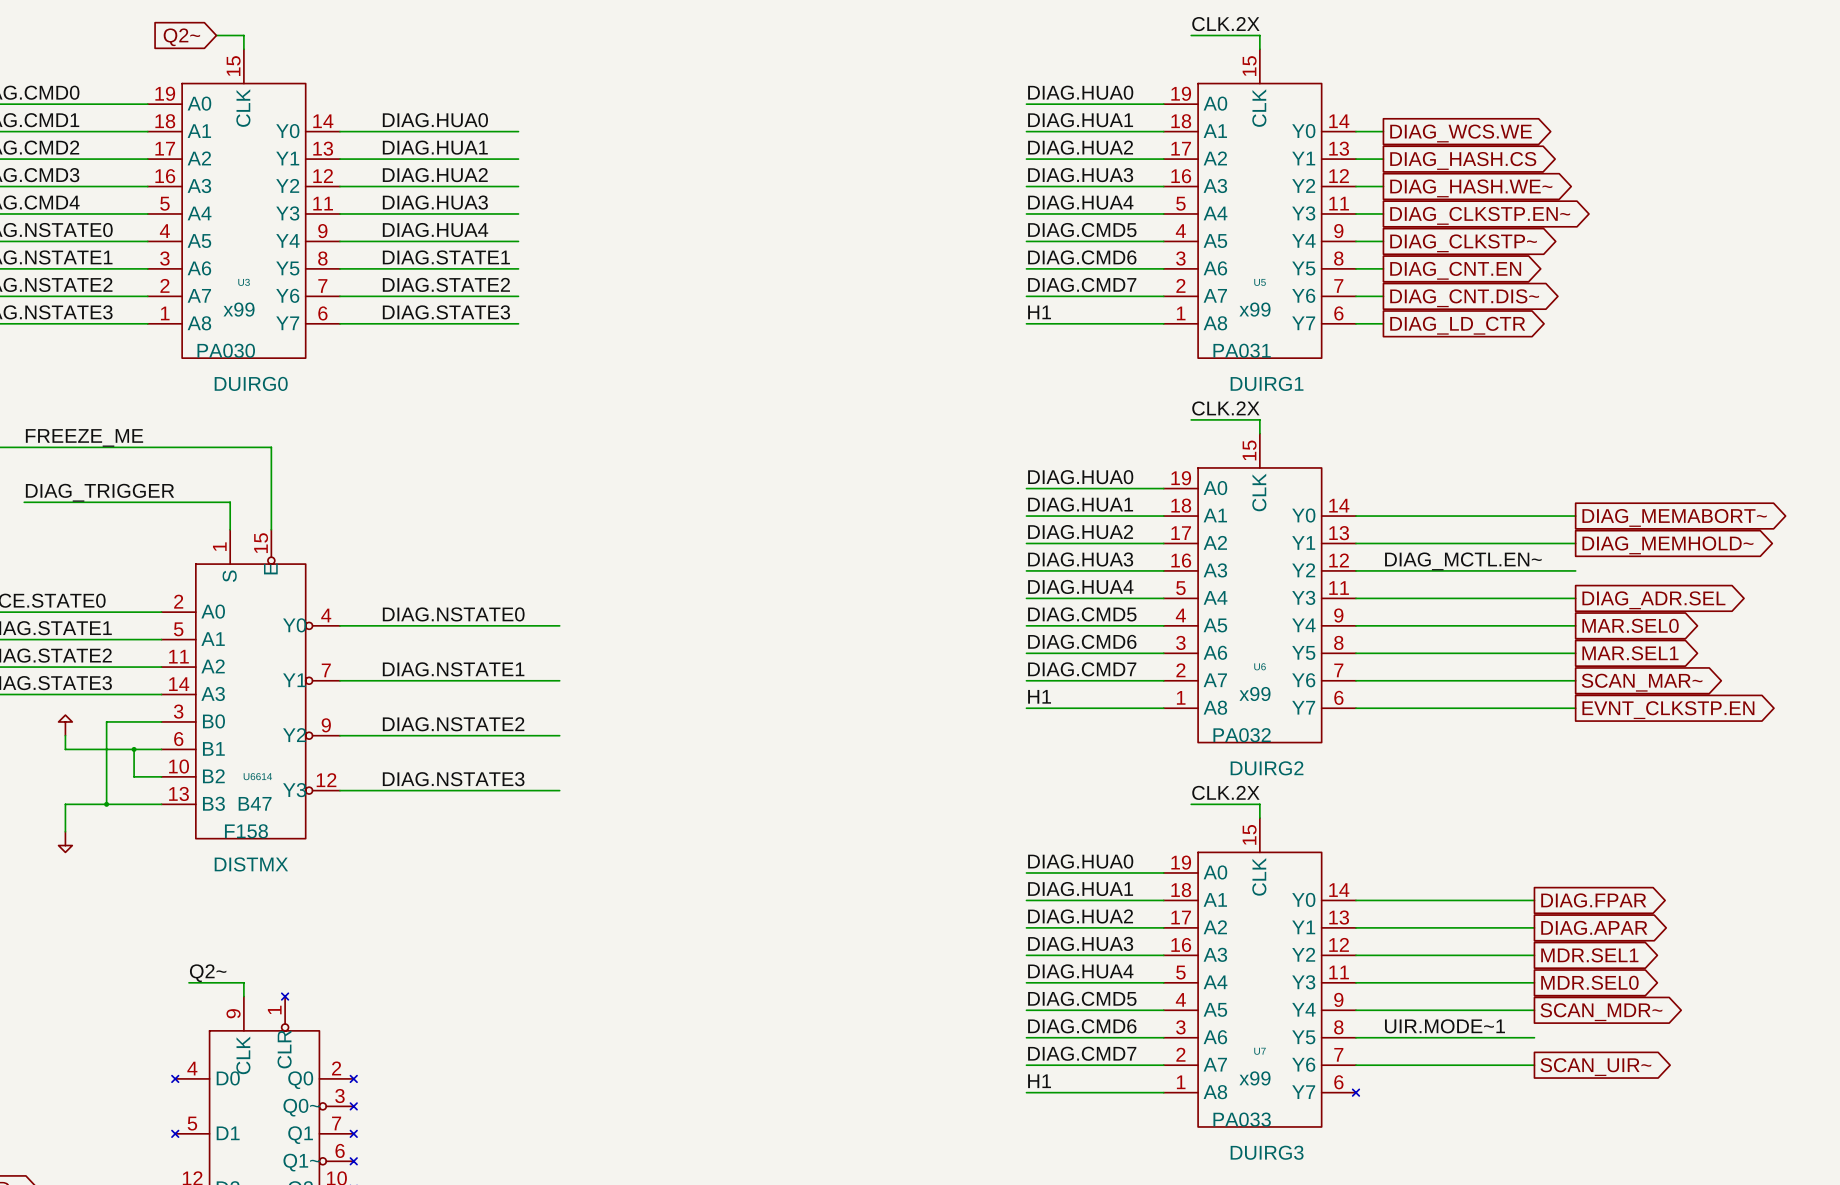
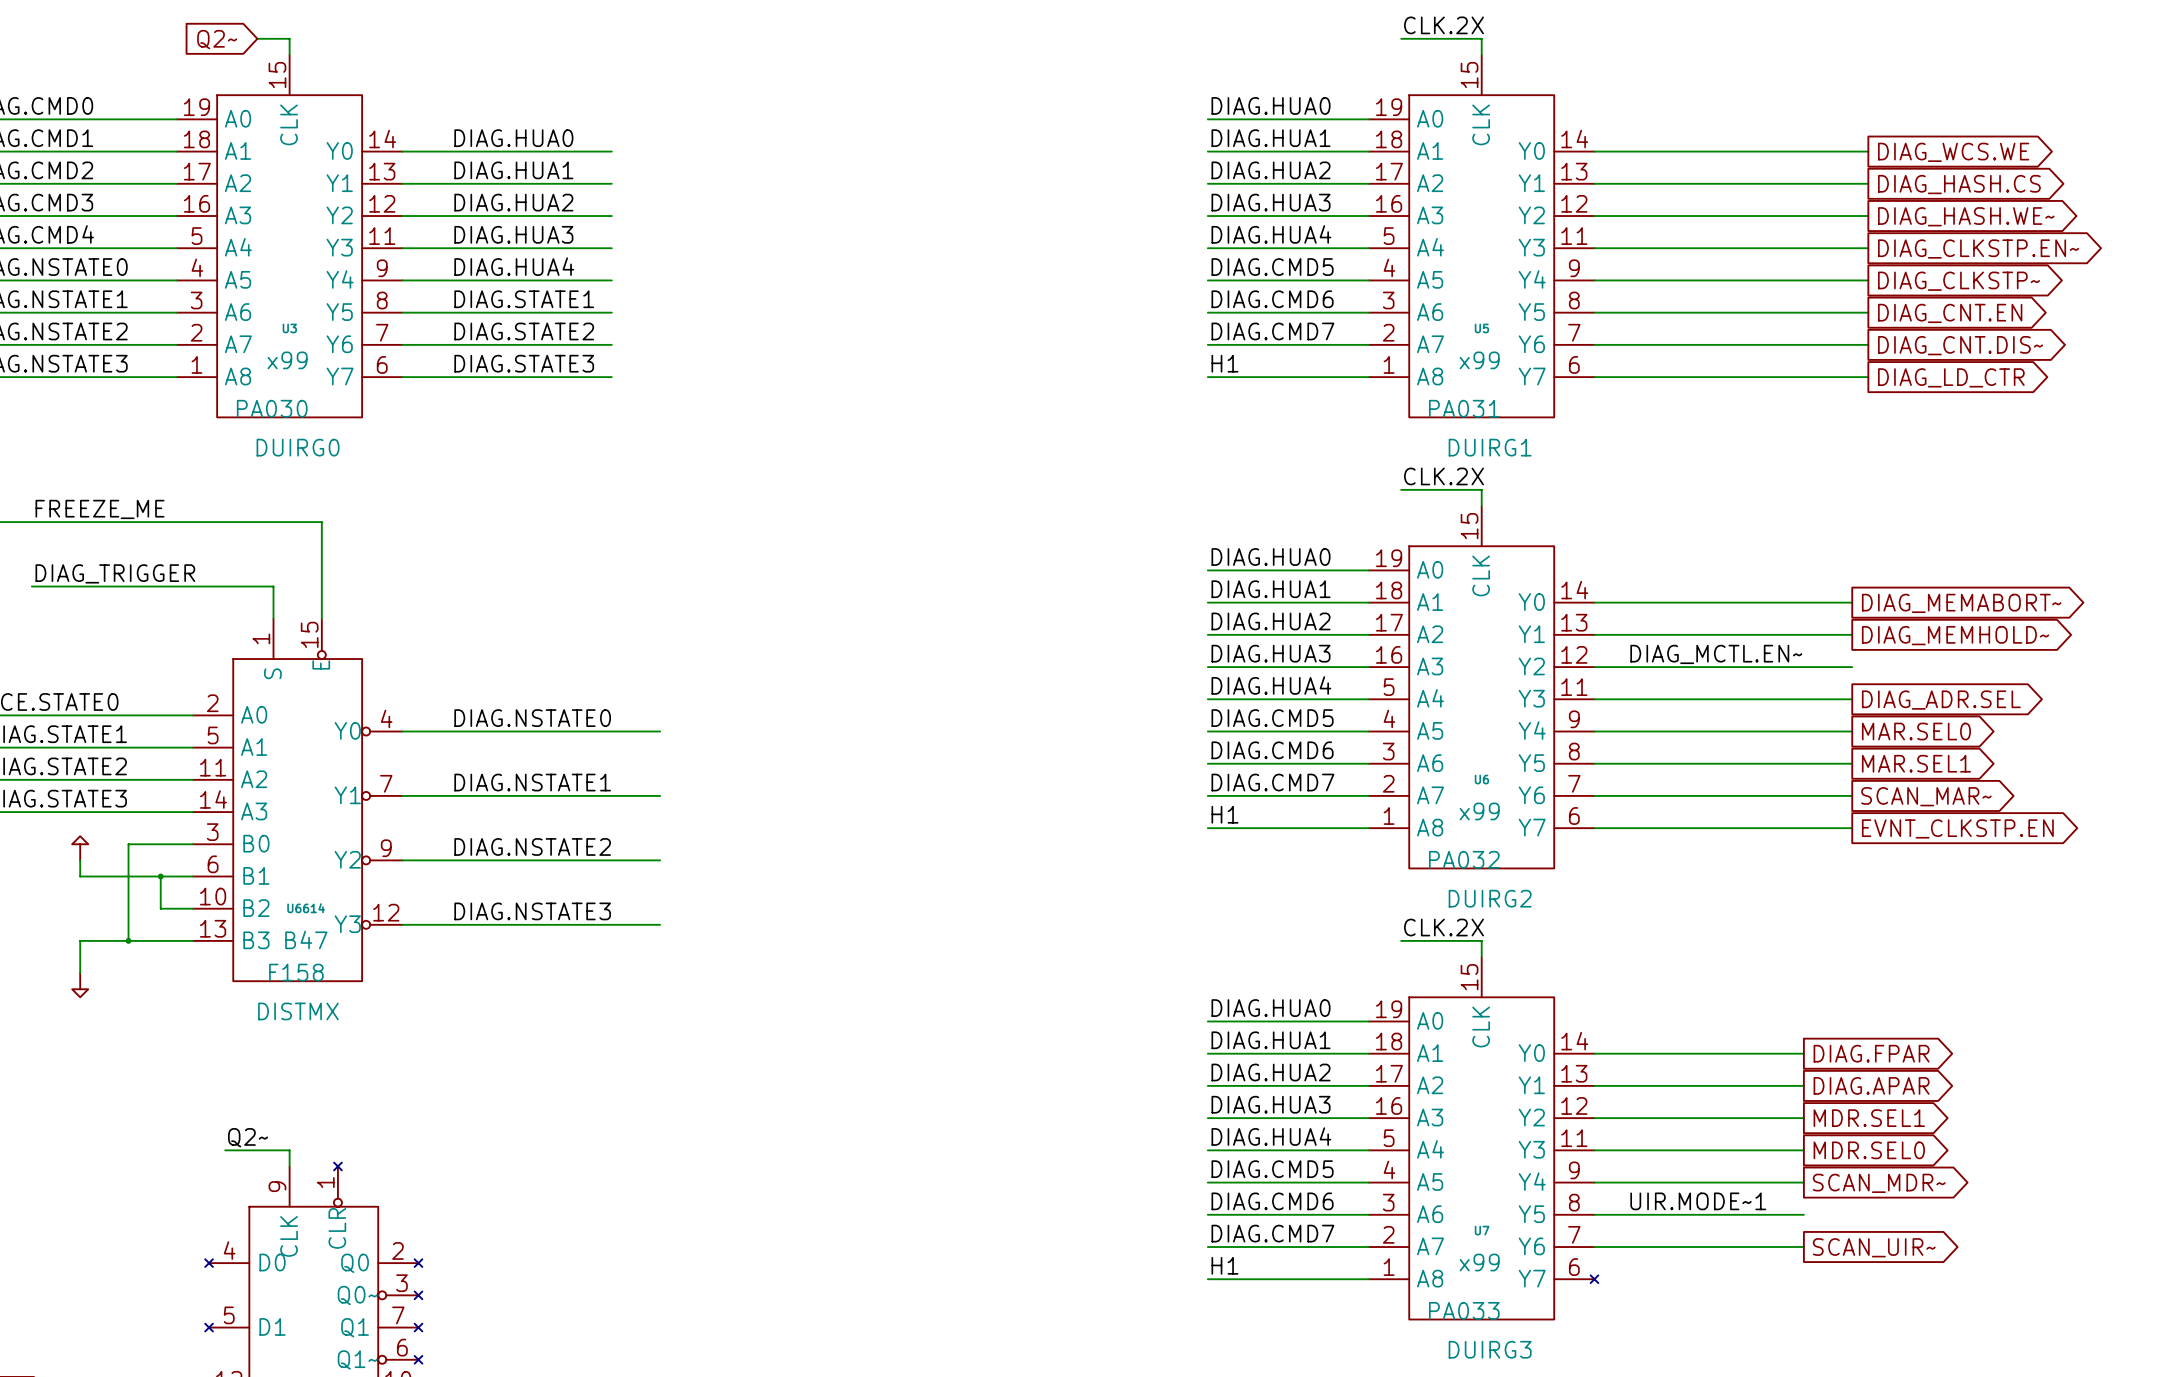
wire: none -> (1626, 151) (1868, 151)
global label: DIAG_WCS.WE (1461, 133) -> none
global label: none -> DIAG_WCS.WE (1953, 152)
wire: none -> (1626, 183) (1868, 183)
global label: DIAG_HASH.CS (1463, 160) -> none
global label: none -> DIAG_HASH.CS (1959, 184)
wire: none -> (1626, 216) (1868, 216)
global label: DIAG_HASH.WE~ (1471, 188) -> none
global label: none -> DIAG_HASH.WE~ (1966, 216)
wire: none -> (1626, 248) (1868, 248)
global label: DIAG_CLKSTP.EN~ (1480, 215) -> none
global label: none -> DIAG_CLKSTP.EN~ (1978, 248)
wire: none -> (1626, 280) (1868, 280)
global label: DIAG_CLKSTP~ (1463, 243) -> none
global label: none -> DIAG_CLKSTP~ (1959, 281)
wire: none -> (1626, 312) (1868, 312)
global label: DIAG_CNT.EN (1455, 270) -> none
global label: none -> DIAG_CNT.EN (1950, 313)
wire: none -> (1626, 344) (1868, 344)
global label: DIAG_CNT.DIS~ (1464, 298) -> none
global label: none -> DIAG_CNT.DIS~ (1960, 345)
wire: none -> (1626, 377) (1868, 377)
global label: DIAG_LD_CTR (1457, 325) -> none
global label: none -> DIAG_LD_CTR (1951, 377)

